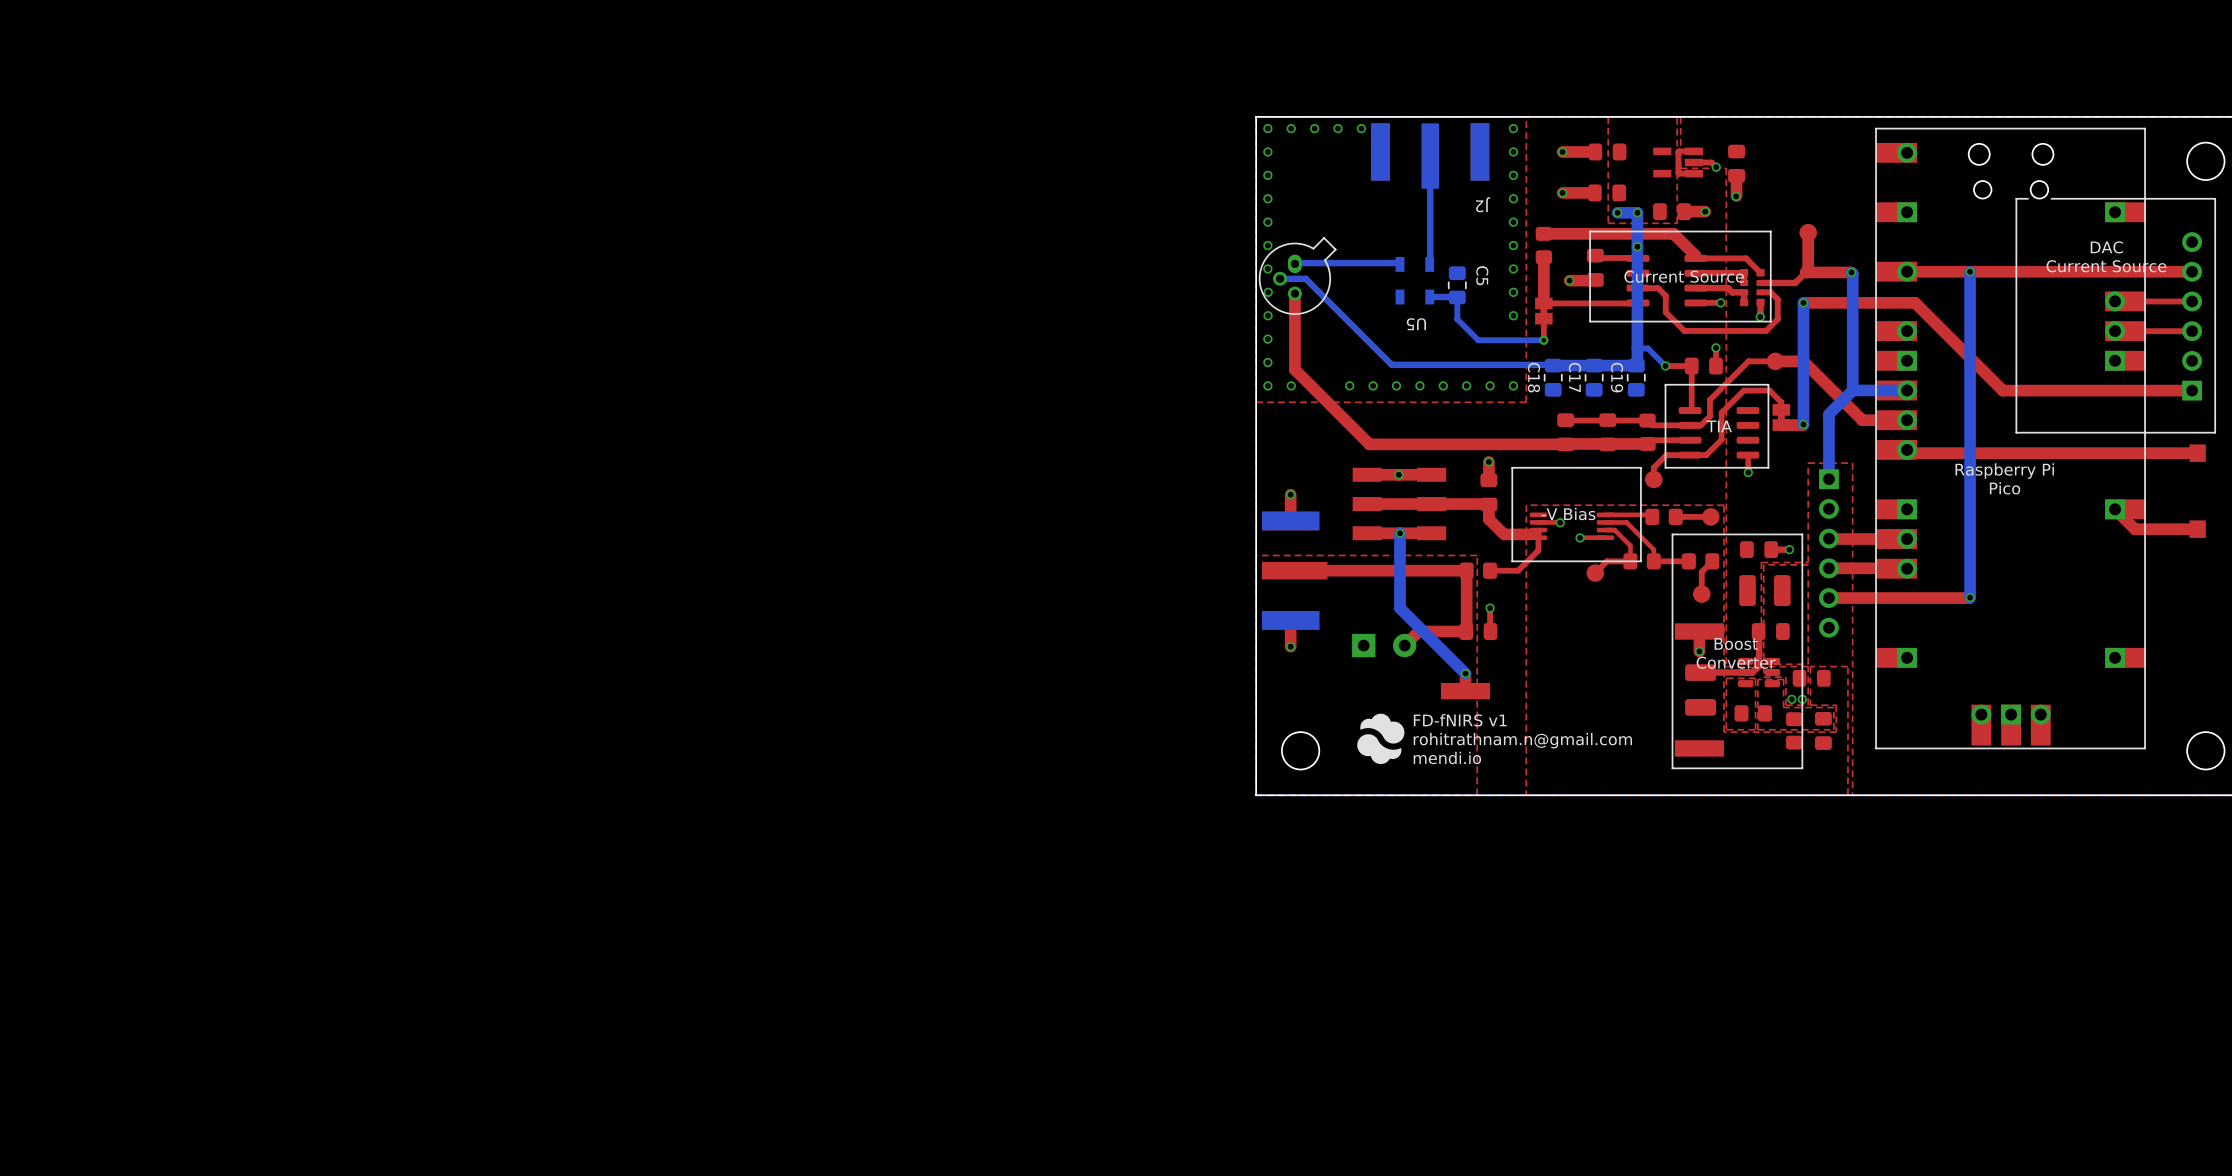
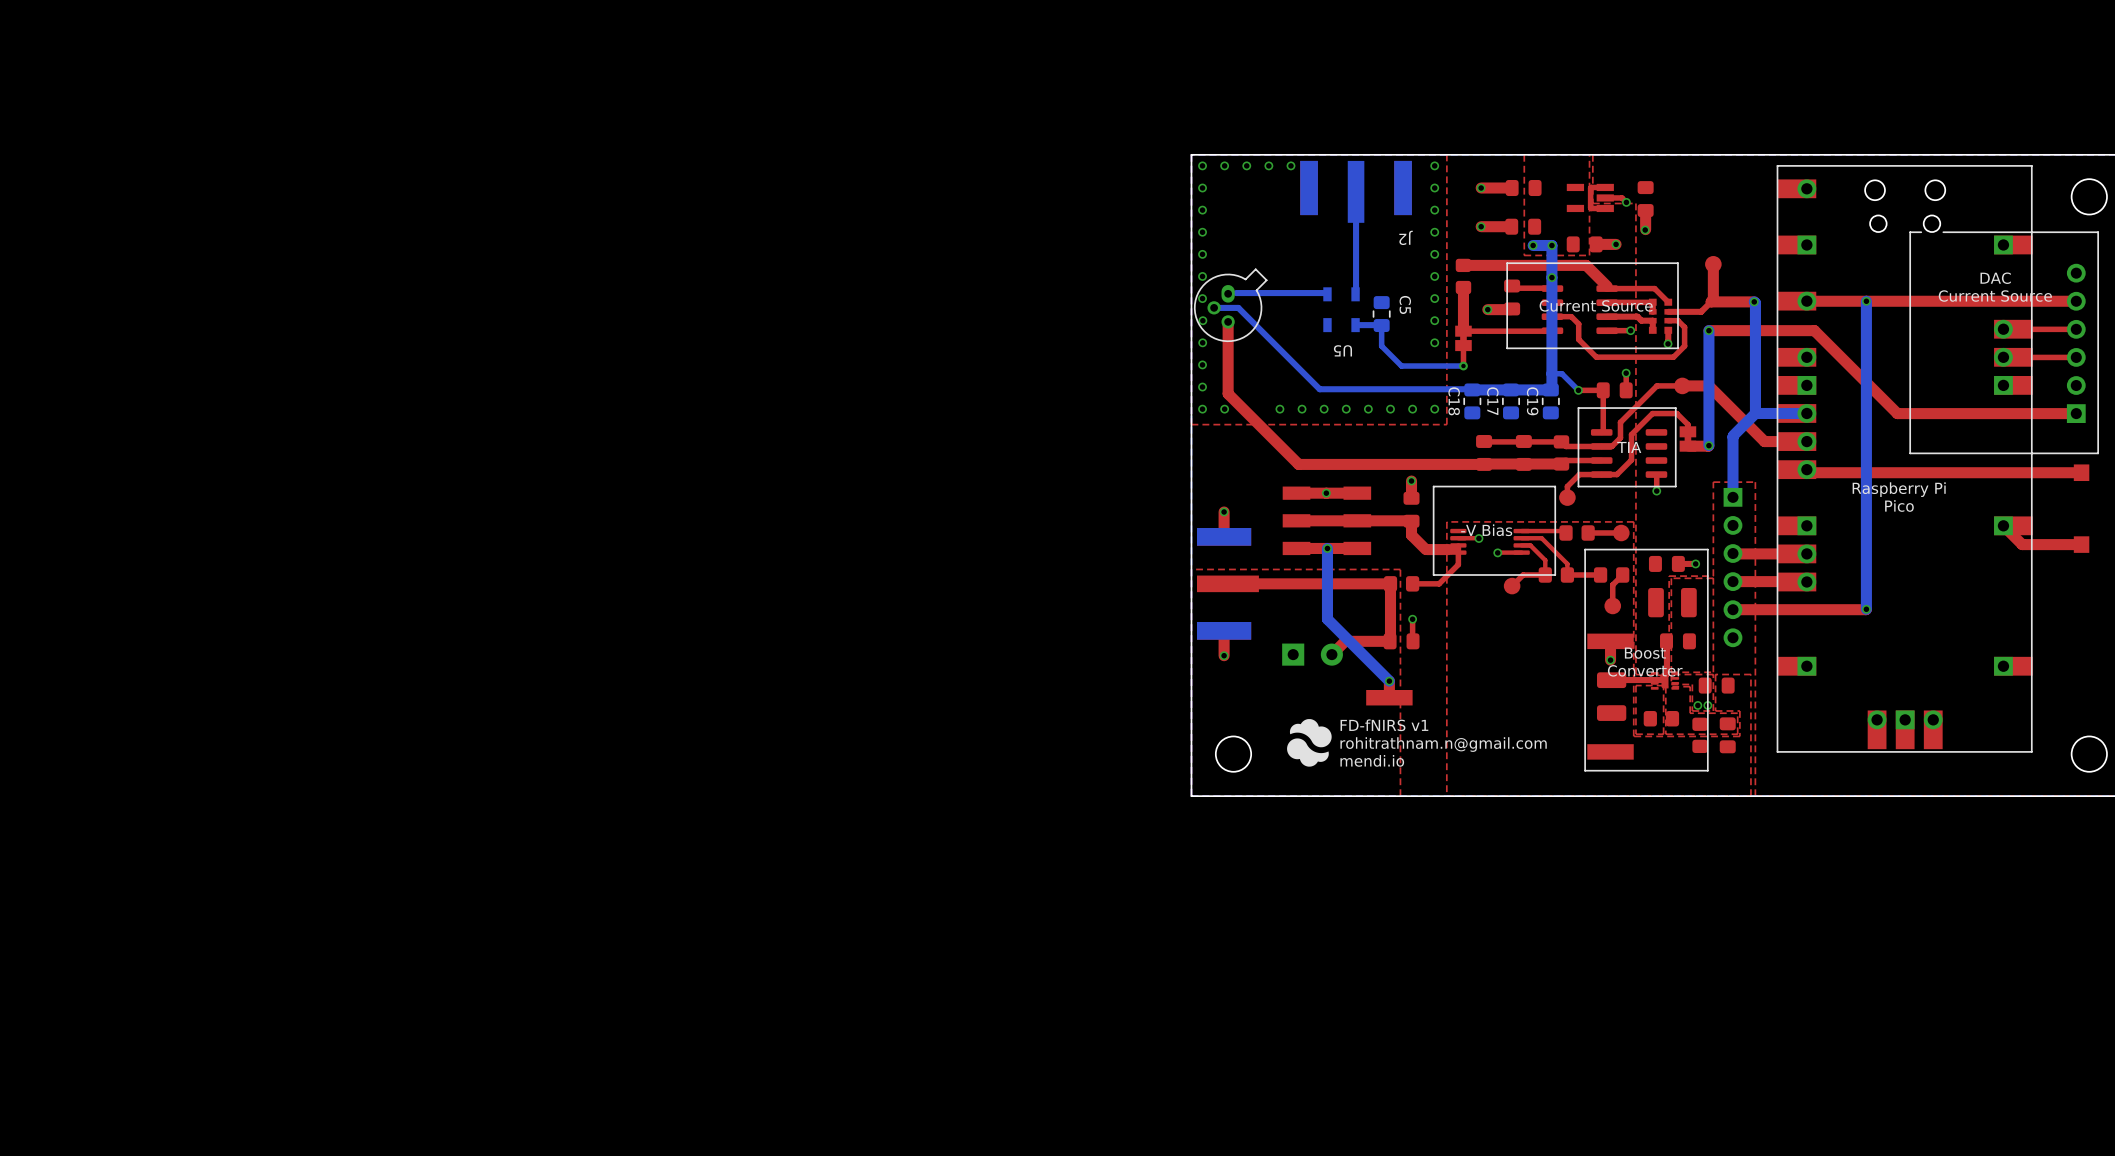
part footprint: [1738, 657, 1781, 688] -> [1650, 672, 1680, 690]

